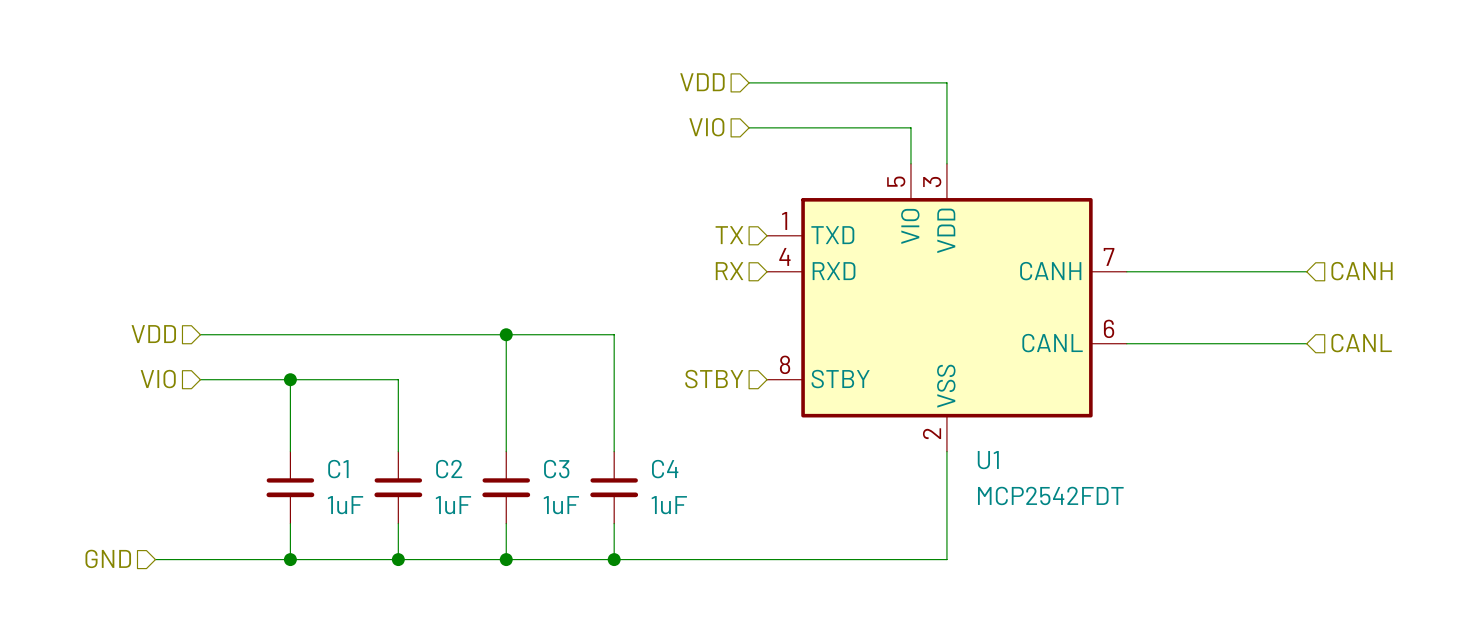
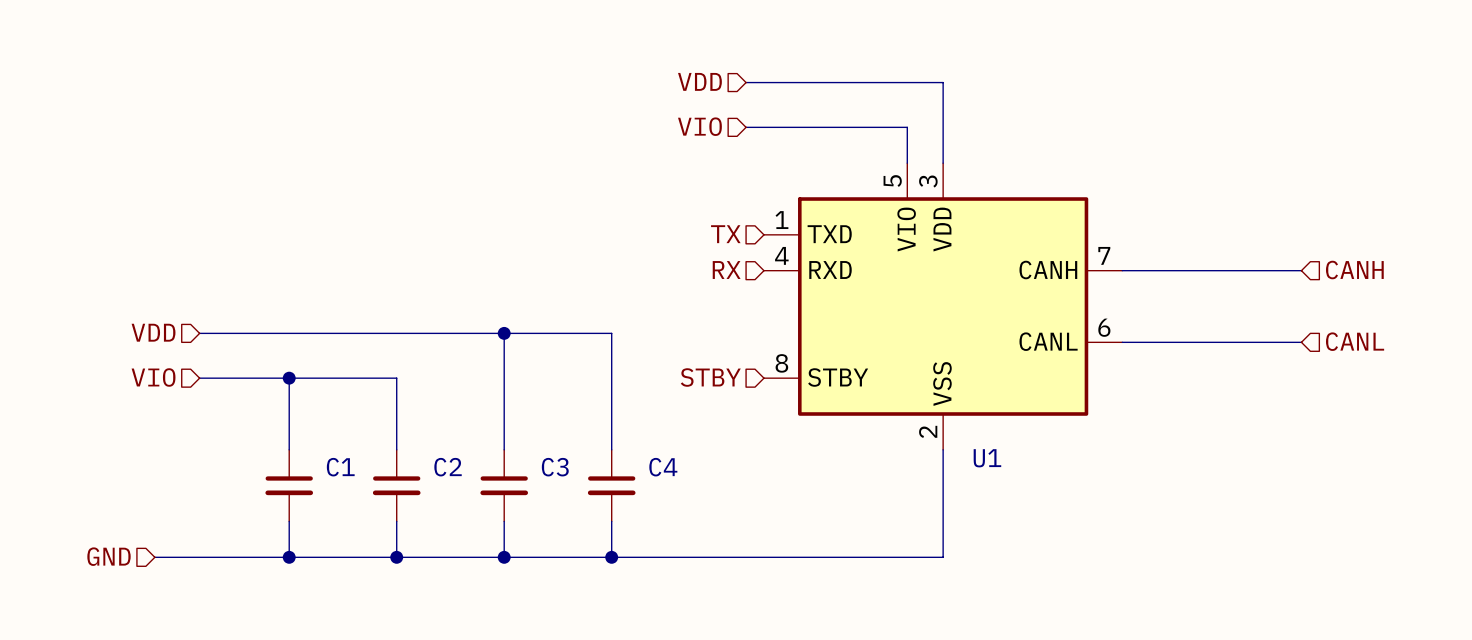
U1 value: MCP2542FDT (1050, 495) -> none
C1 value: 1uF (345, 505) -> none
C2 value: 1uF (453, 505) -> none
C3 value: 1uF (561, 505) -> none
C4 value: 1uF (669, 505) -> none

